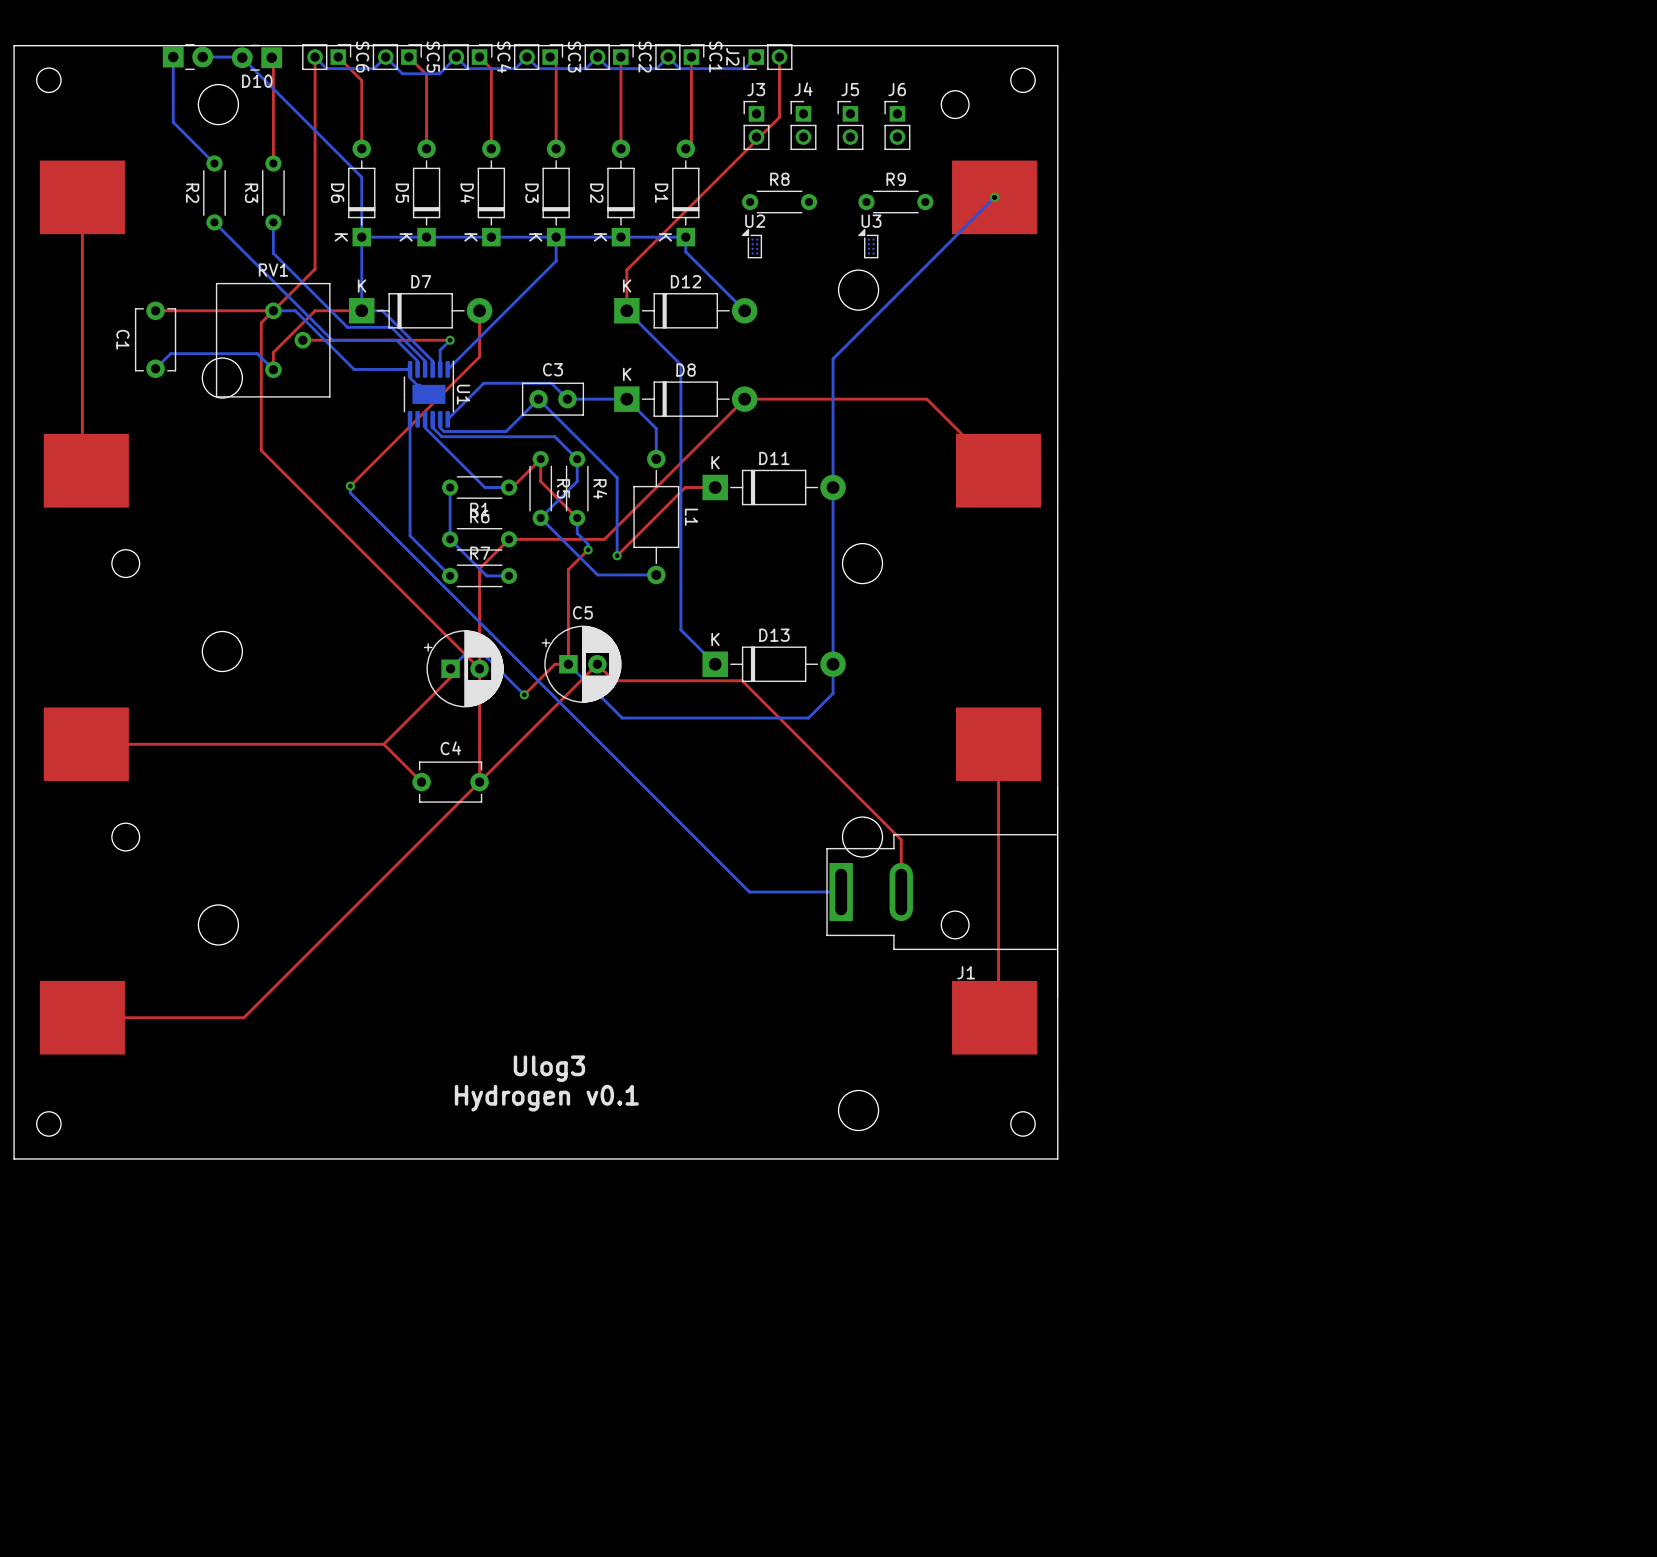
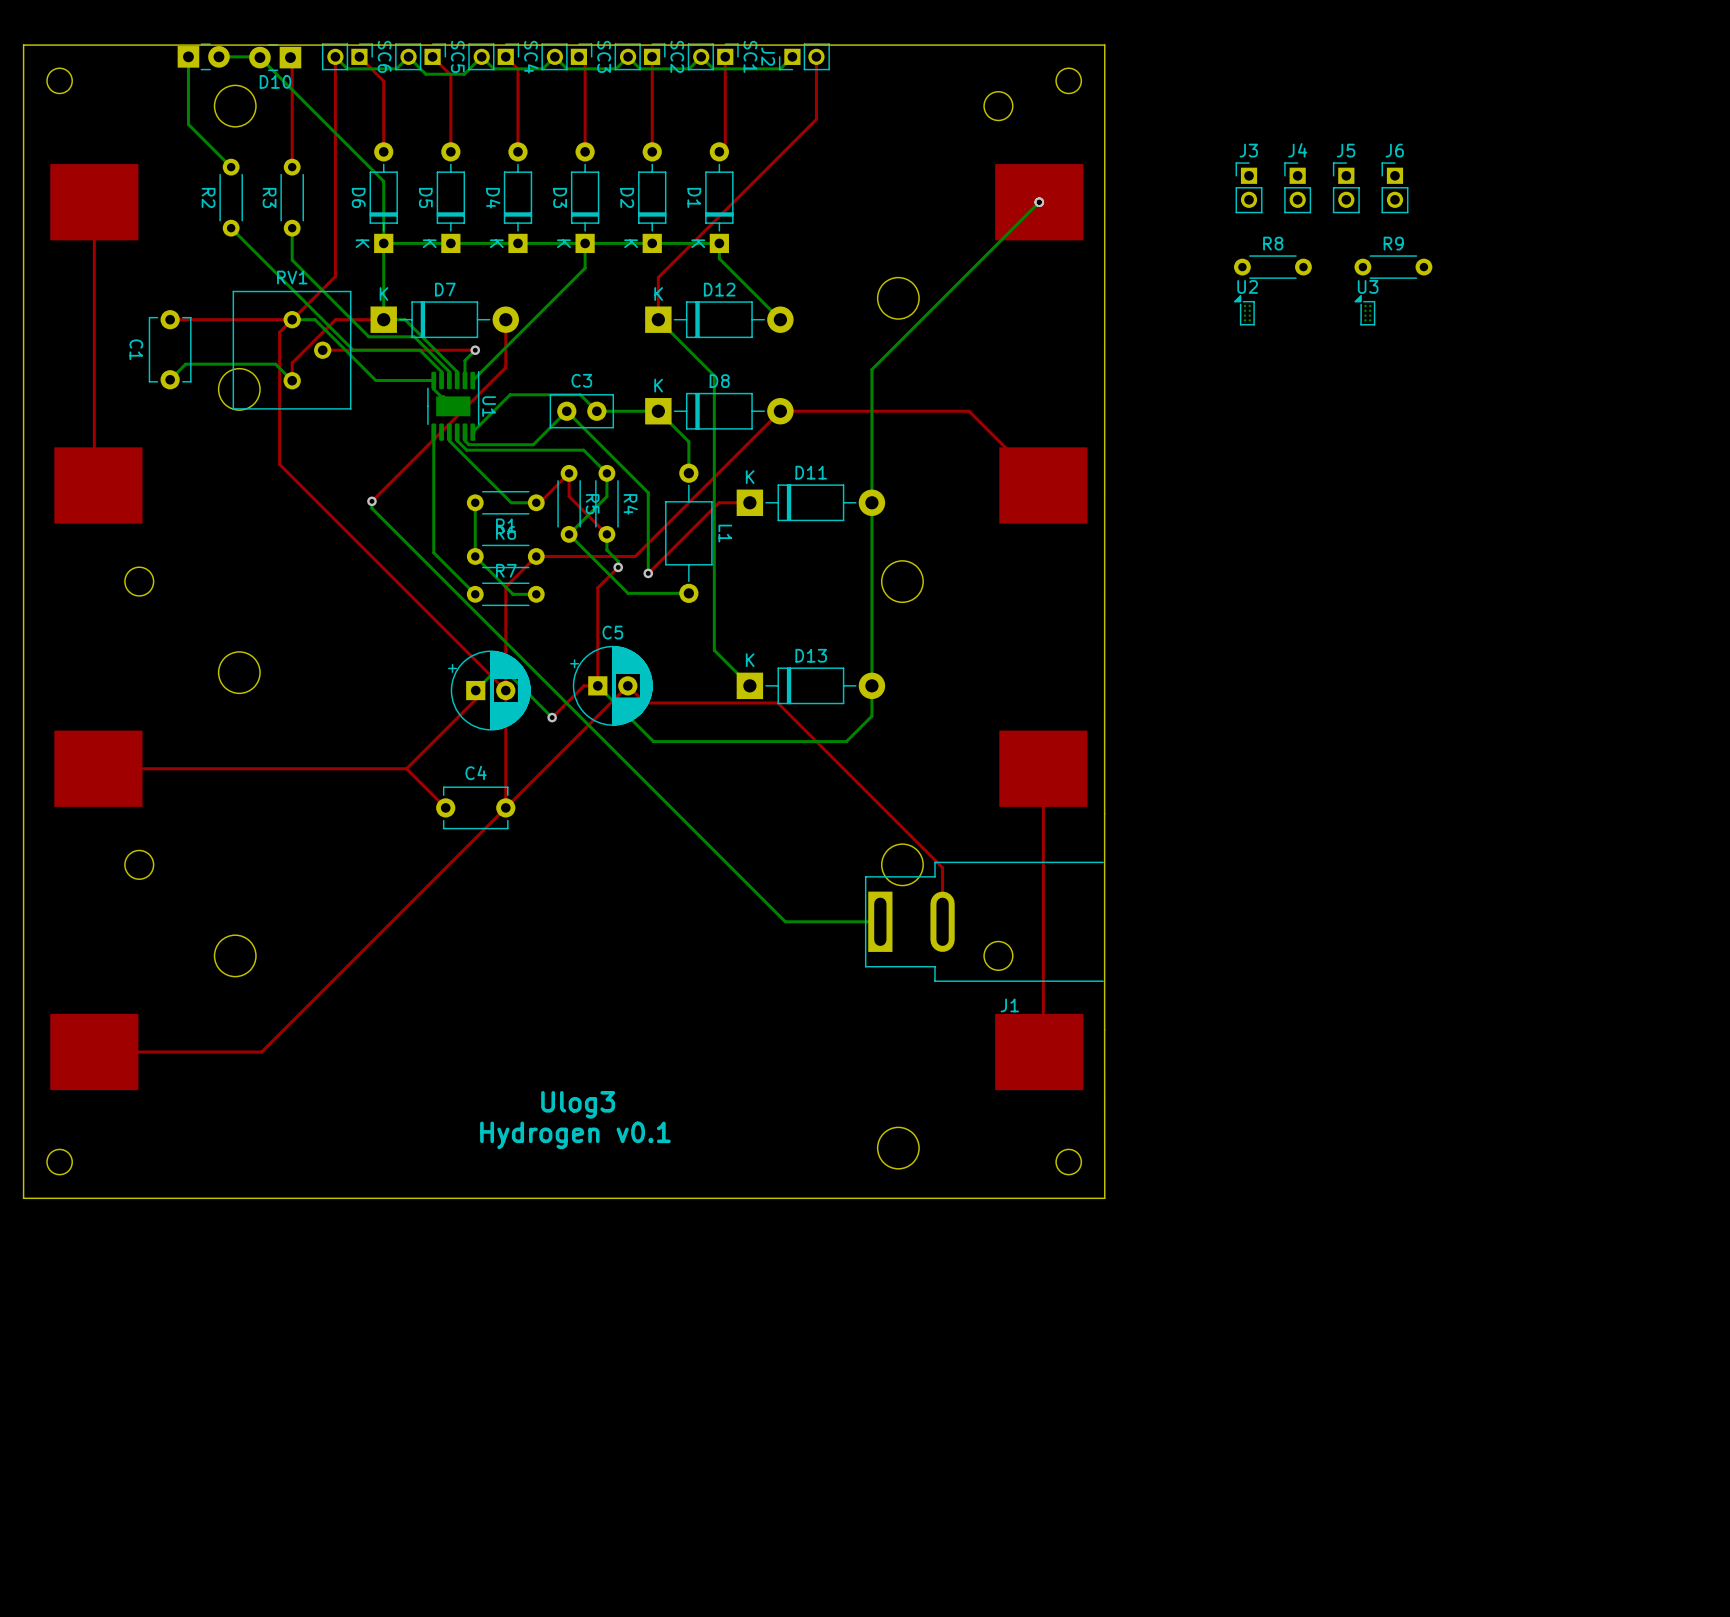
J3 position: (756, 125) -> (1249, 187)
J4 position: (803, 125) -> (1297, 187)
J5 position: (850, 125) -> (1346, 187)
J6 position: (897, 125) -> (1394, 187)
R8 position: (779, 202) -> (1272, 267)
R9 position: (895, 202) -> (1393, 267)
U2 position: (751, 243) -> (1244, 310)
U3 position: (868, 243) -> (1364, 310)

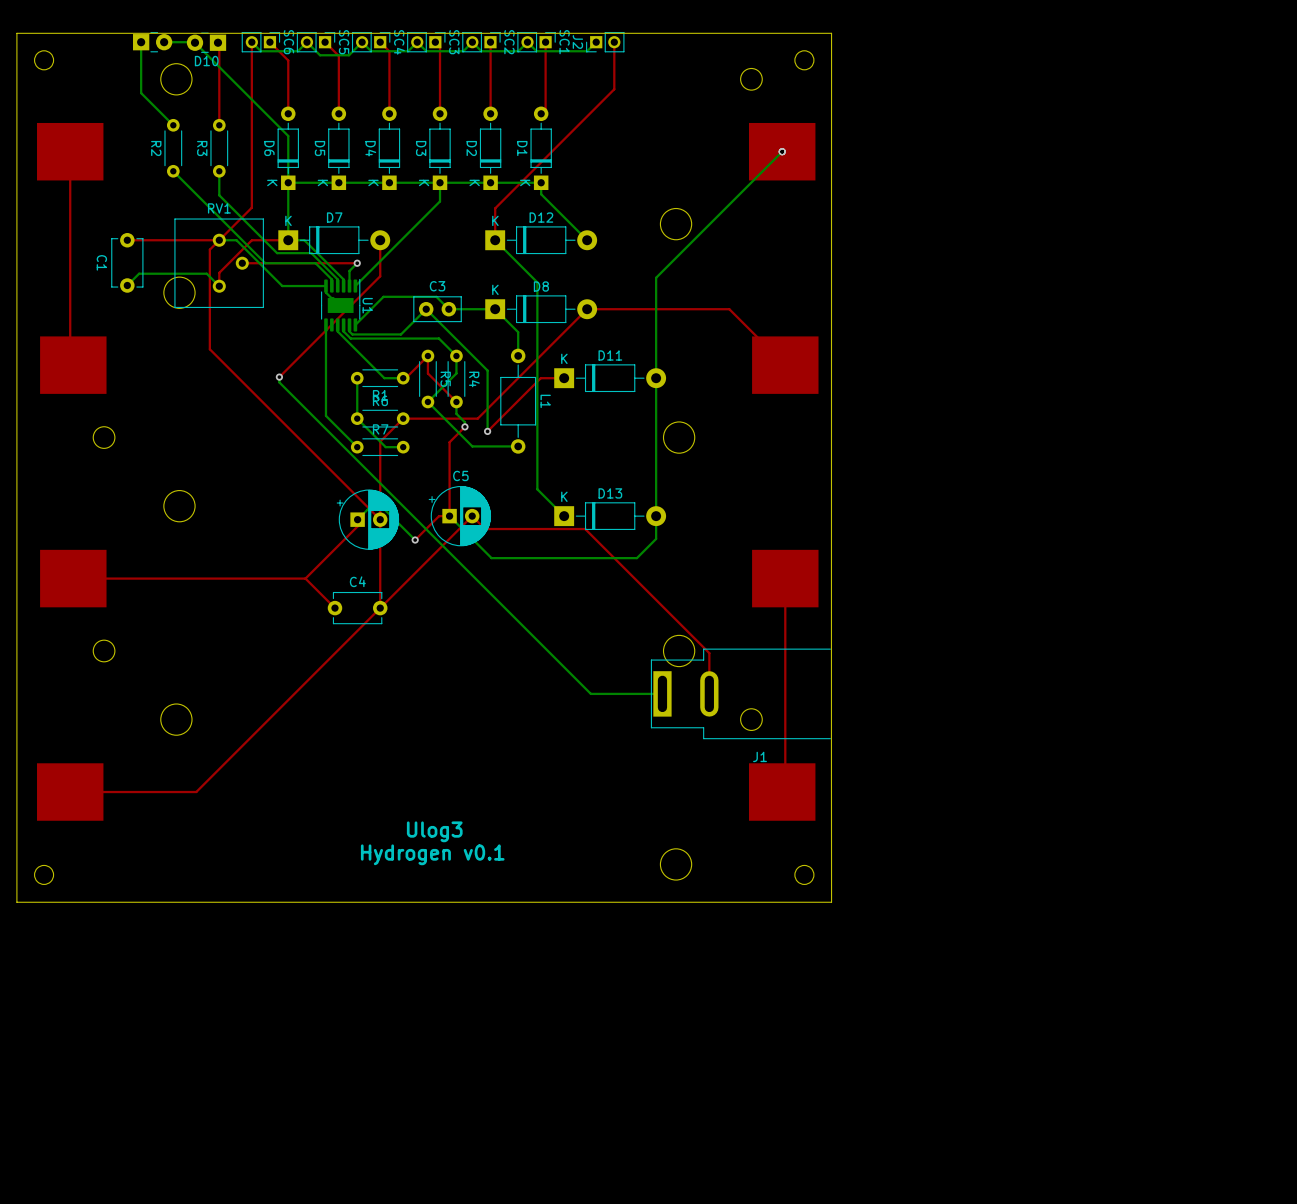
J3: (1249, 187) -> none
J4: (1297, 187) -> none
J5: (1346, 187) -> none
J6: (1394, 187) -> none
R8: (1272, 267) -> none
R9: (1393, 267) -> none
U2: (1244, 310) -> none
U3: (1364, 310) -> none

